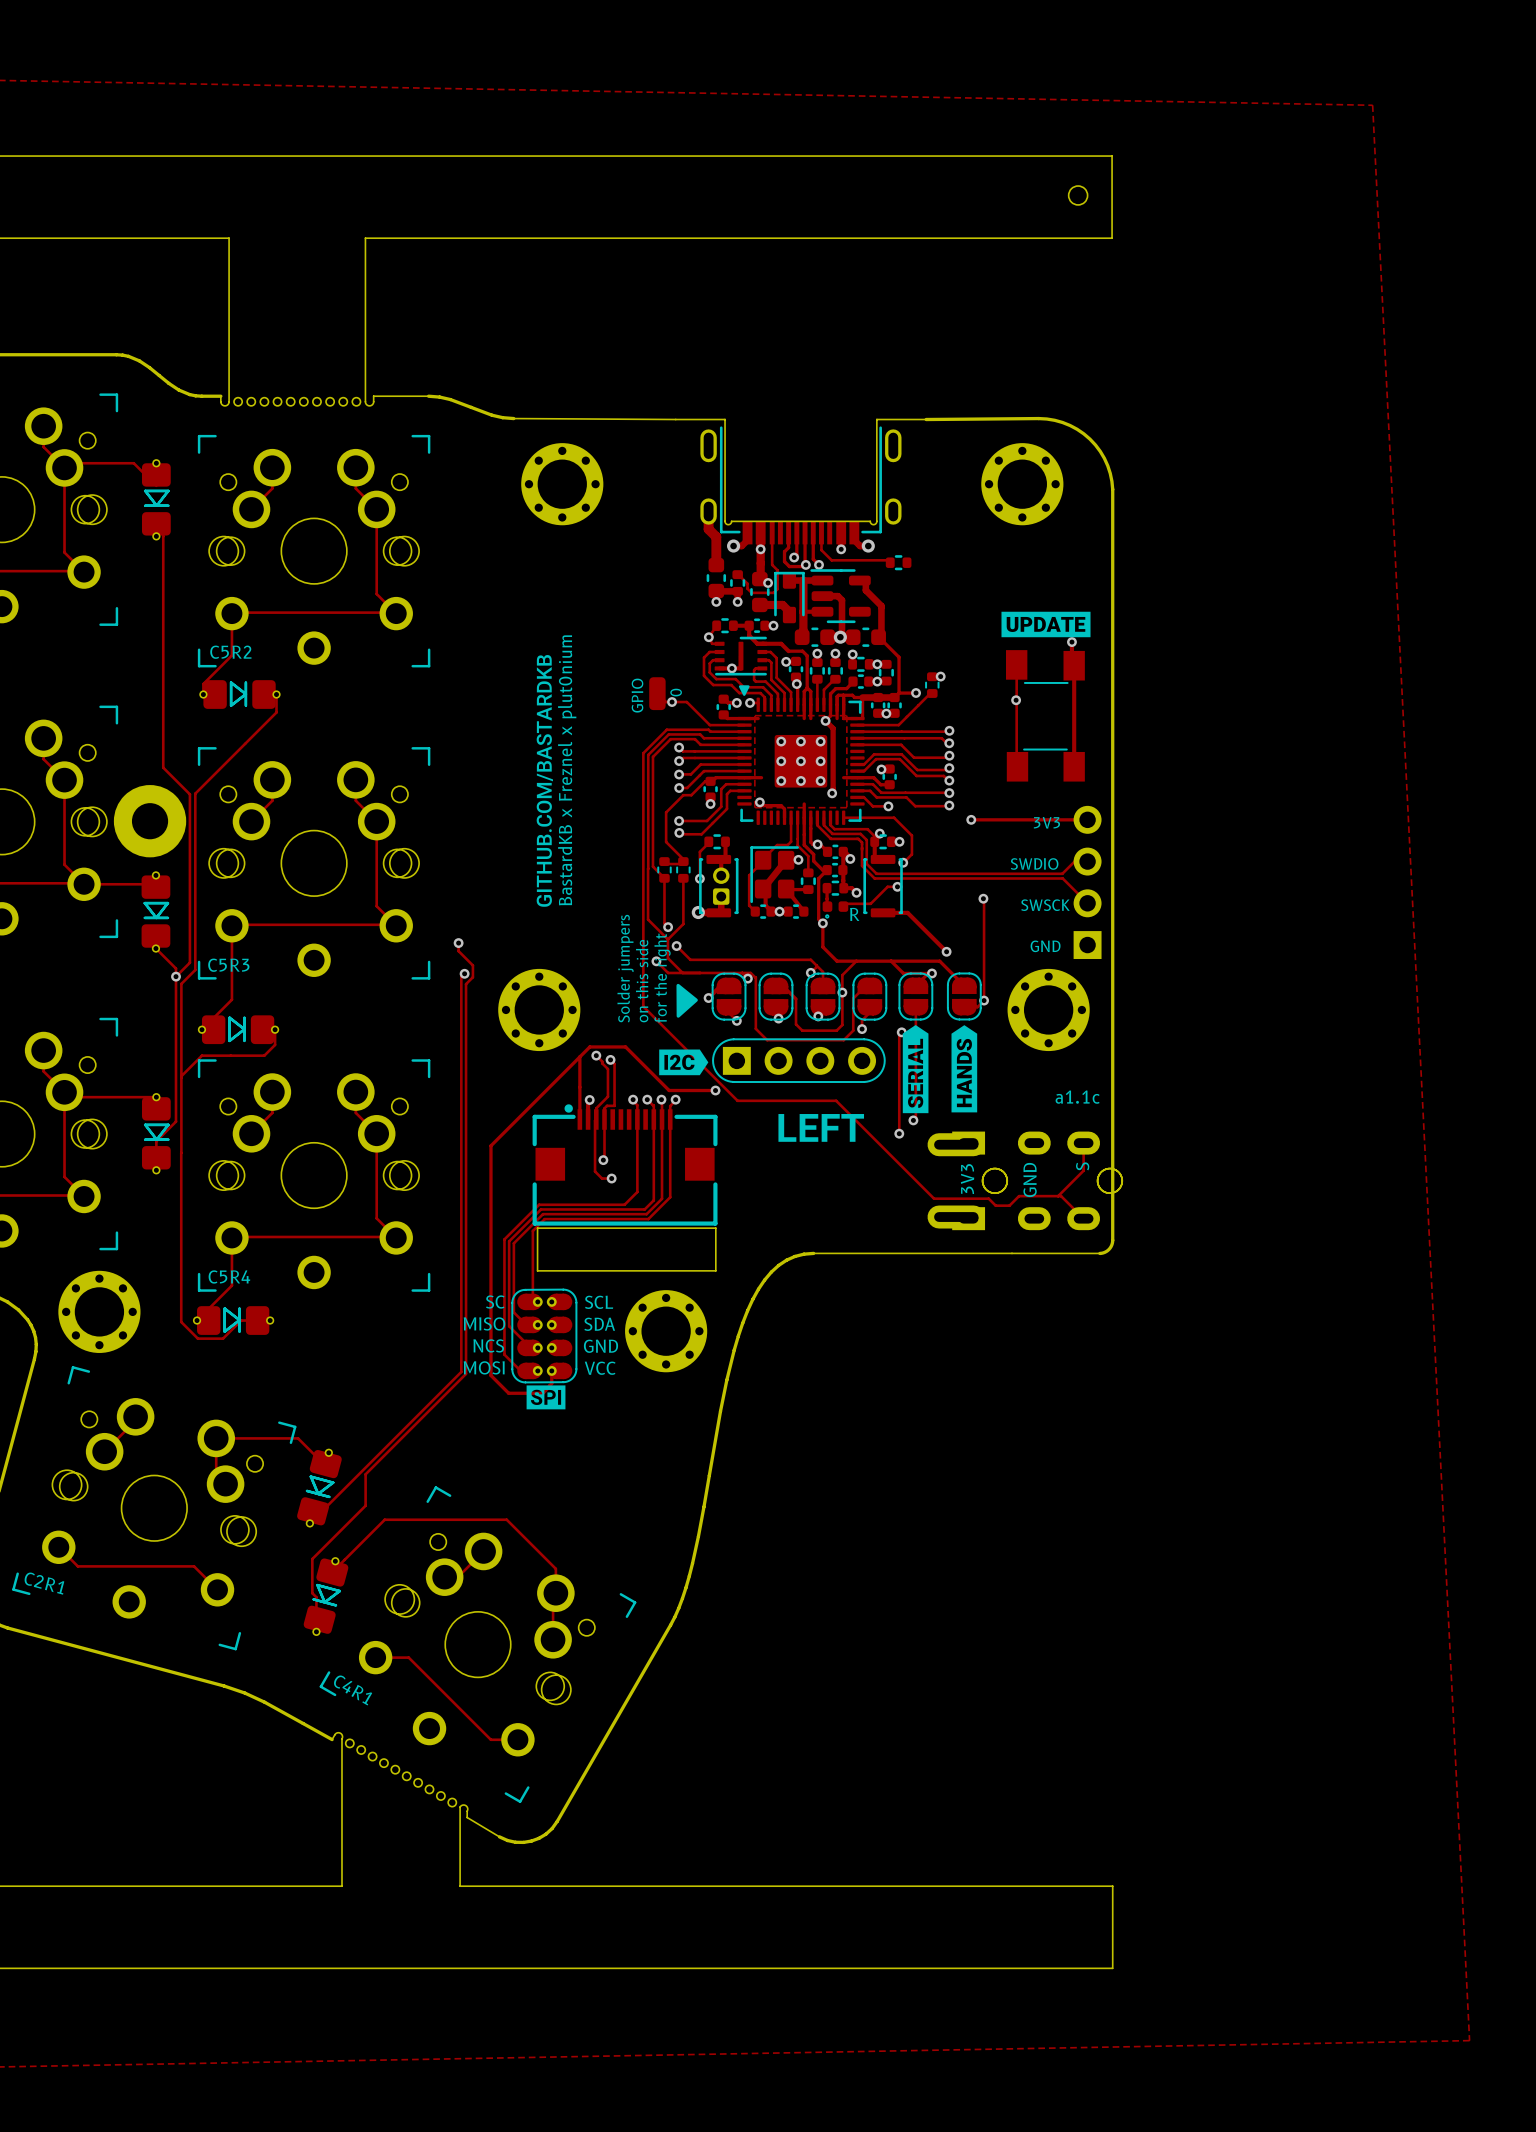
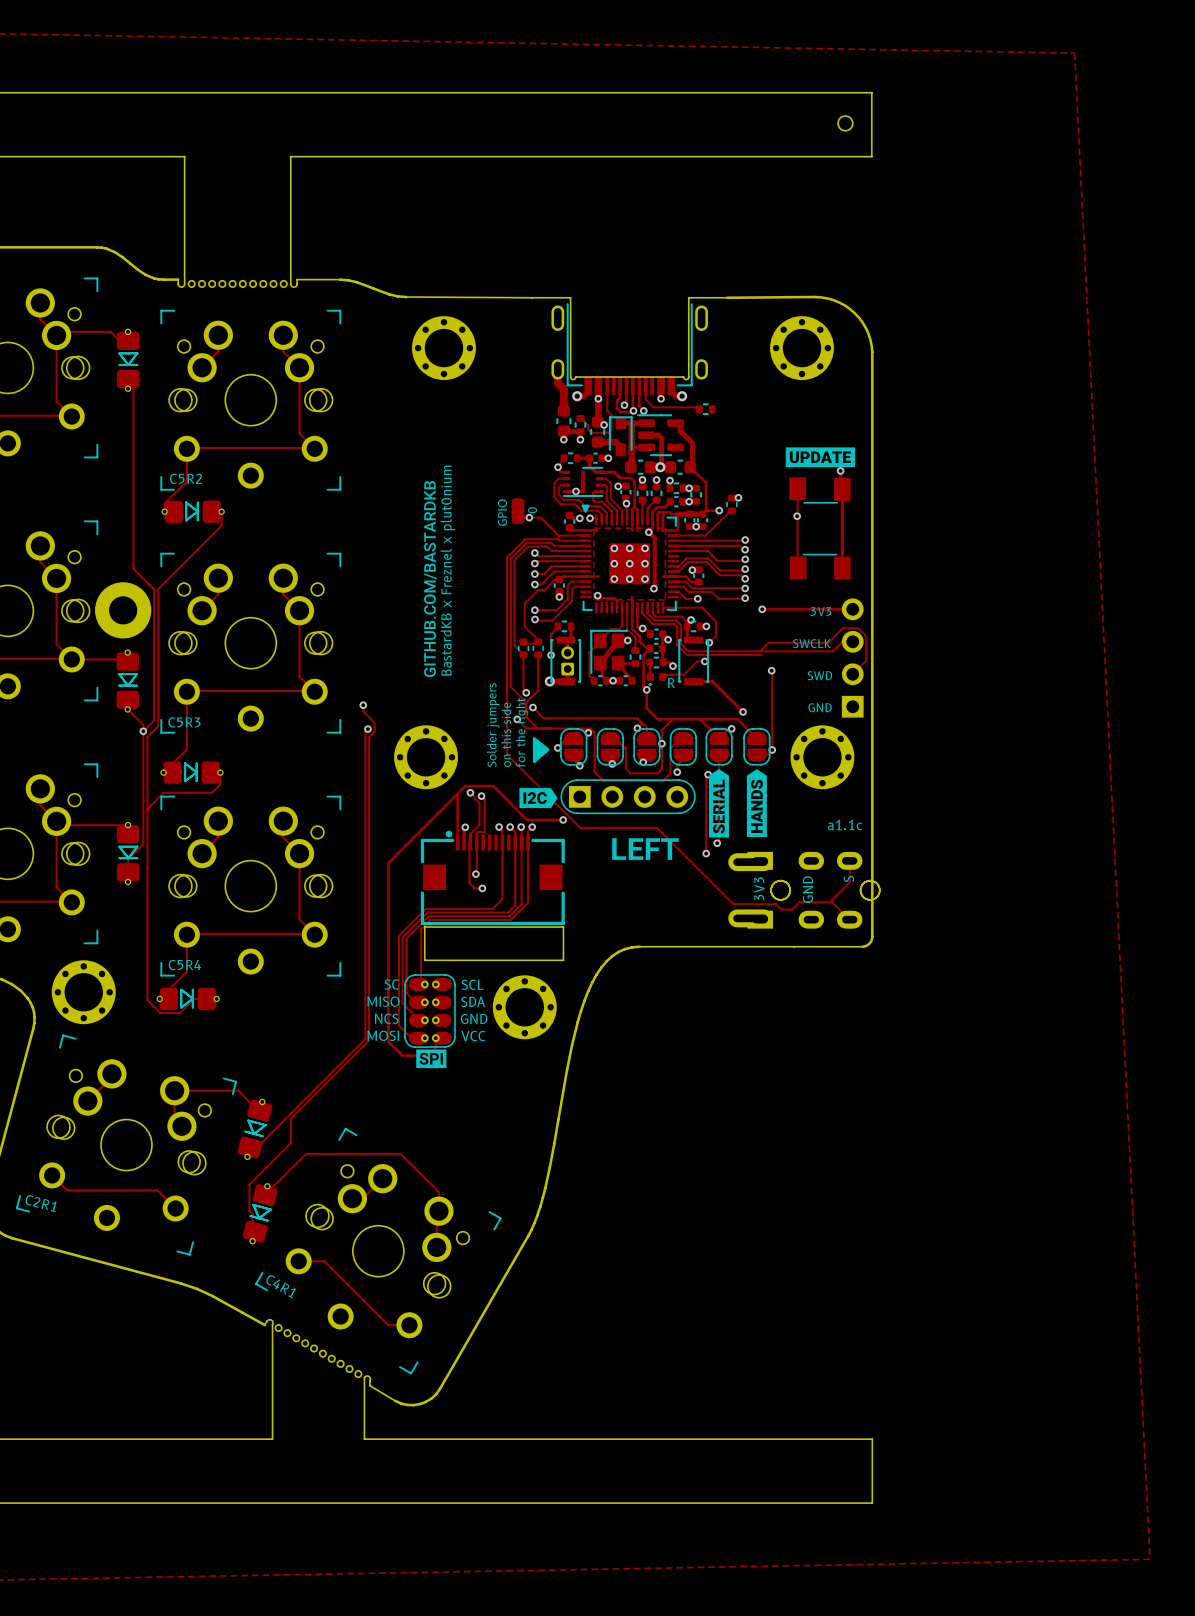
text: SWDIO (1034, 863) -> SWCLK (811, 643)
track: (970, 878) (1062, 878) (1087, 903) -> (760, 651) (768, 642) (828, 642) (842, 628) (858, 628) (866, 636) (866, 660) (852, 674)
text: SWSCK (1045, 905) -> SWD (819, 675)

